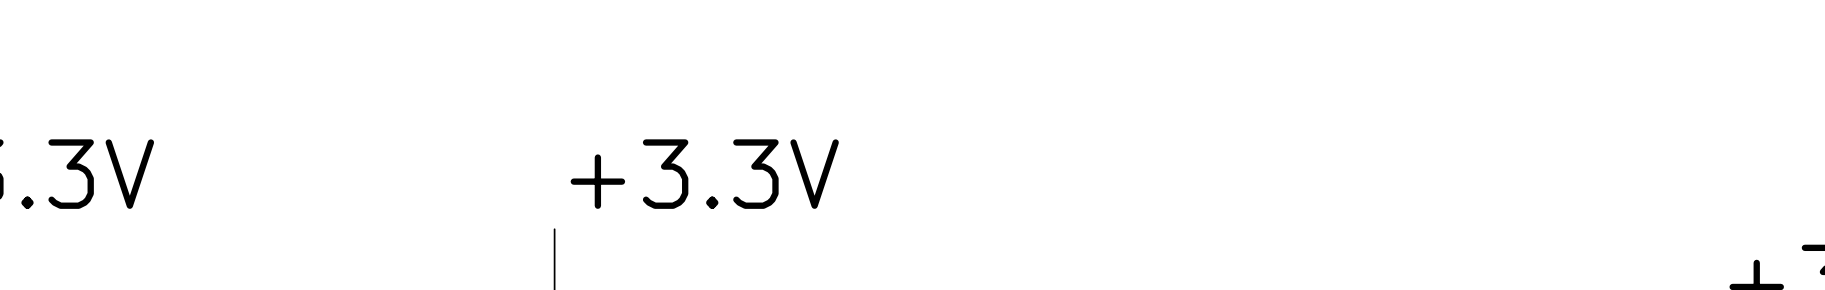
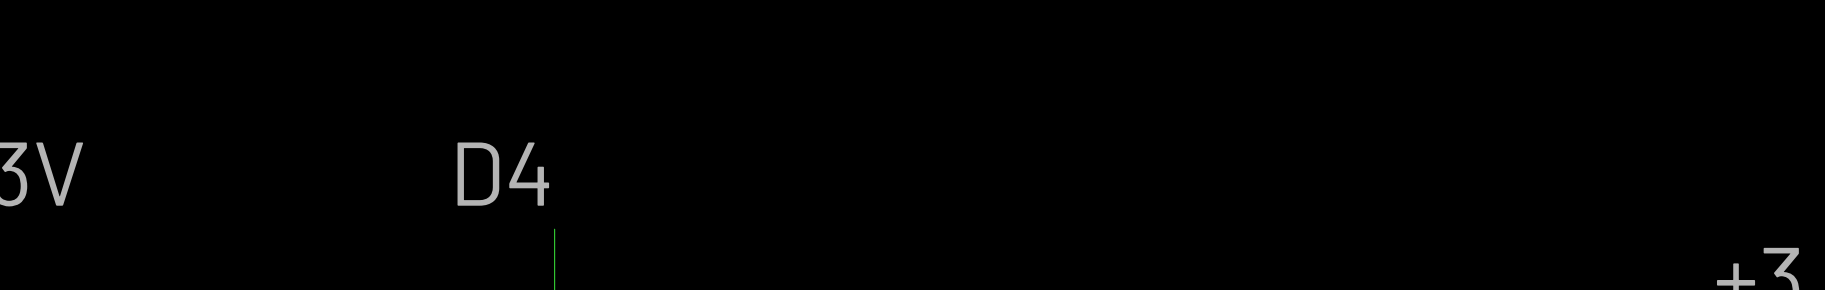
label: +3.3V (704, 174) -> D4 (503, 174)

